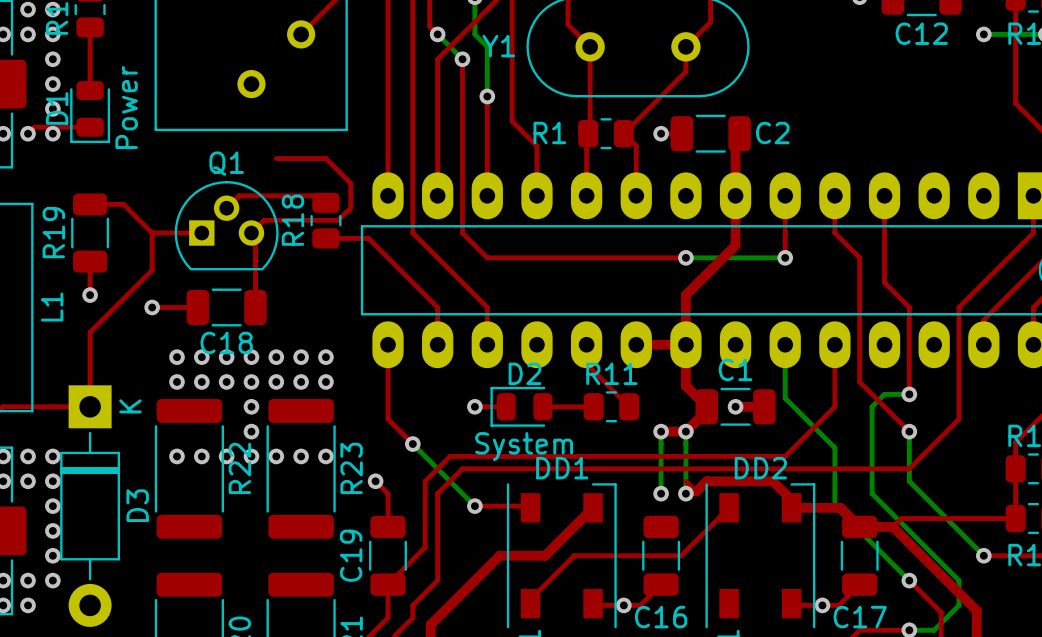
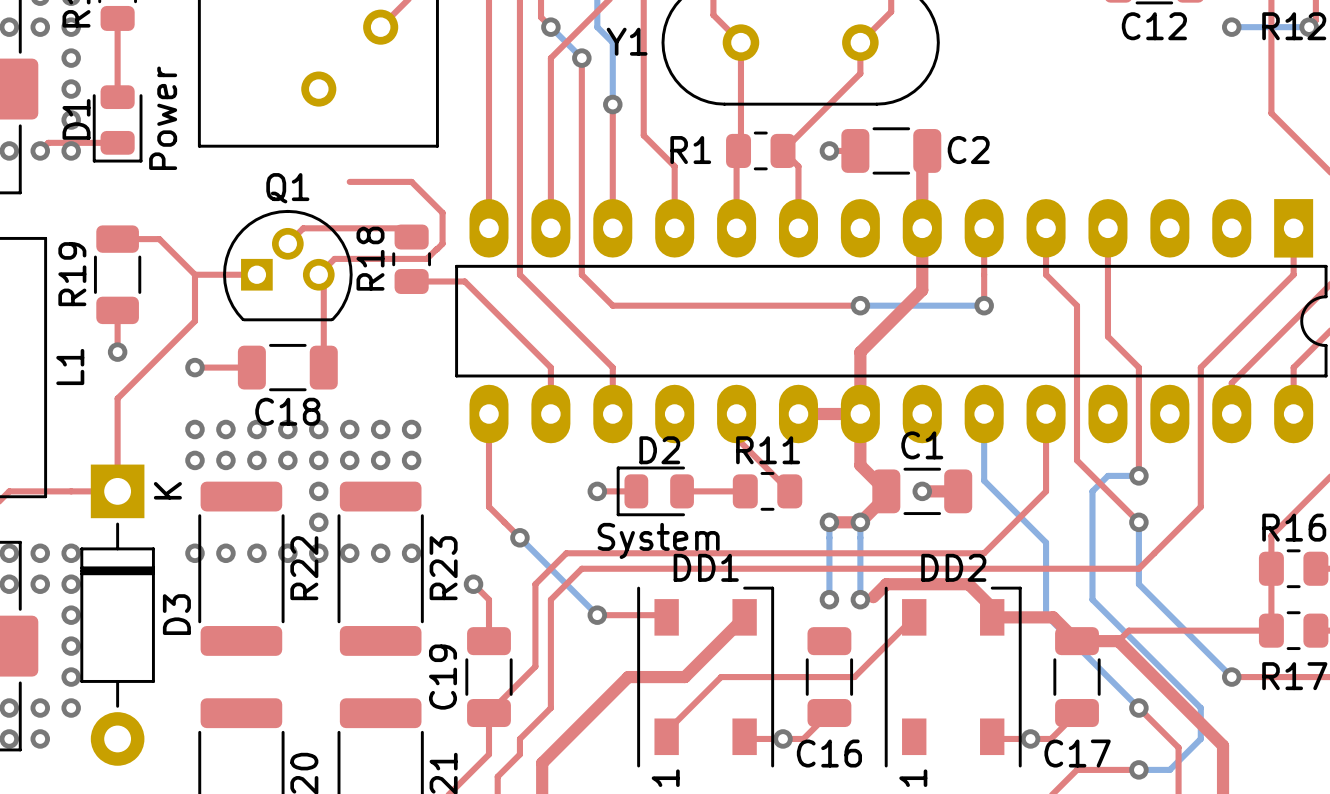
via: none -> (194, 429)
via: none -> (194, 460)
via: none -> (194, 553)
top track: (685, 481) (696, 491) -> none

